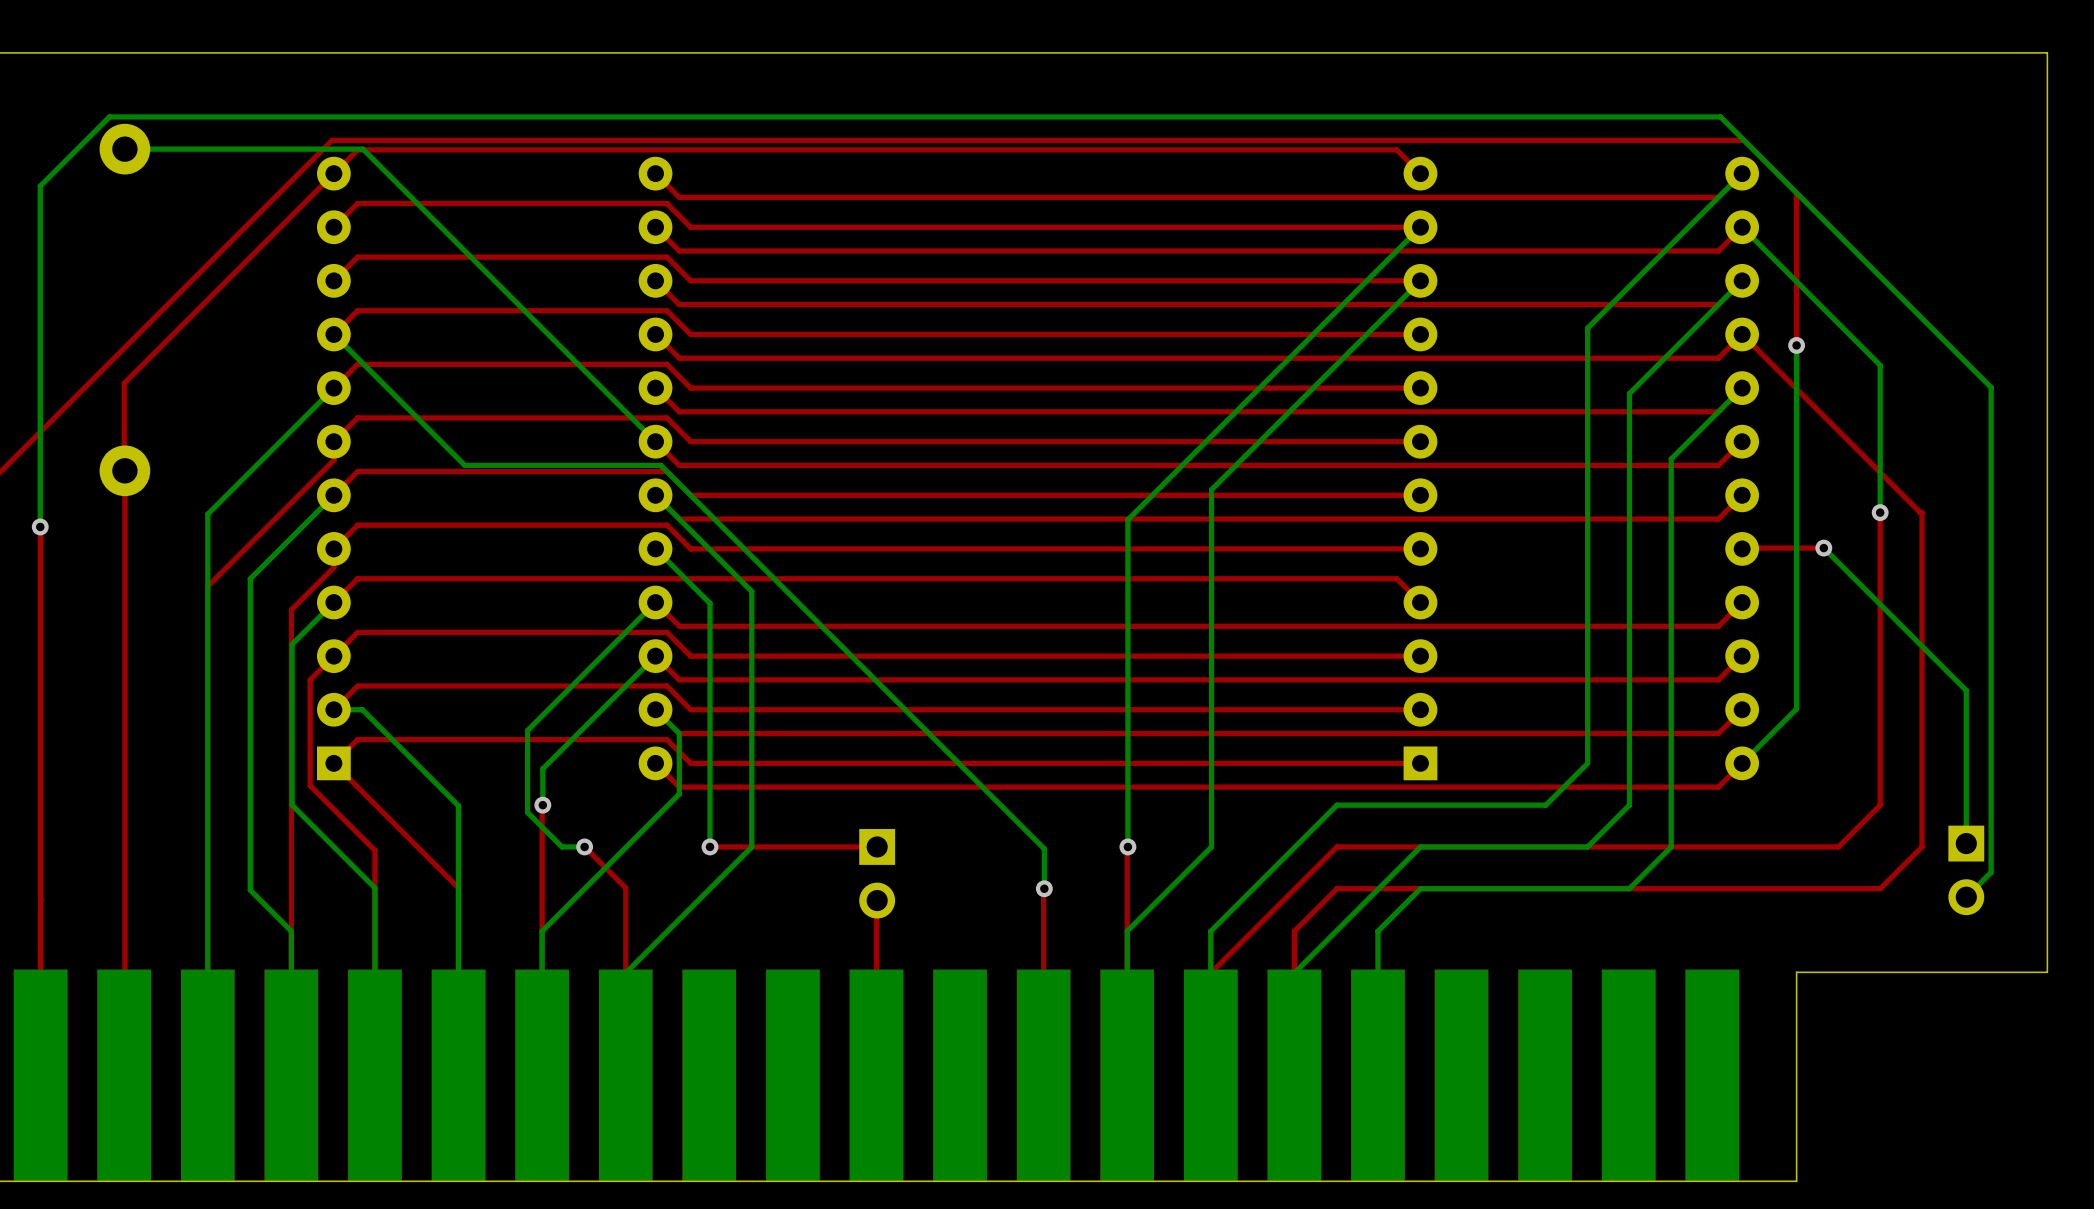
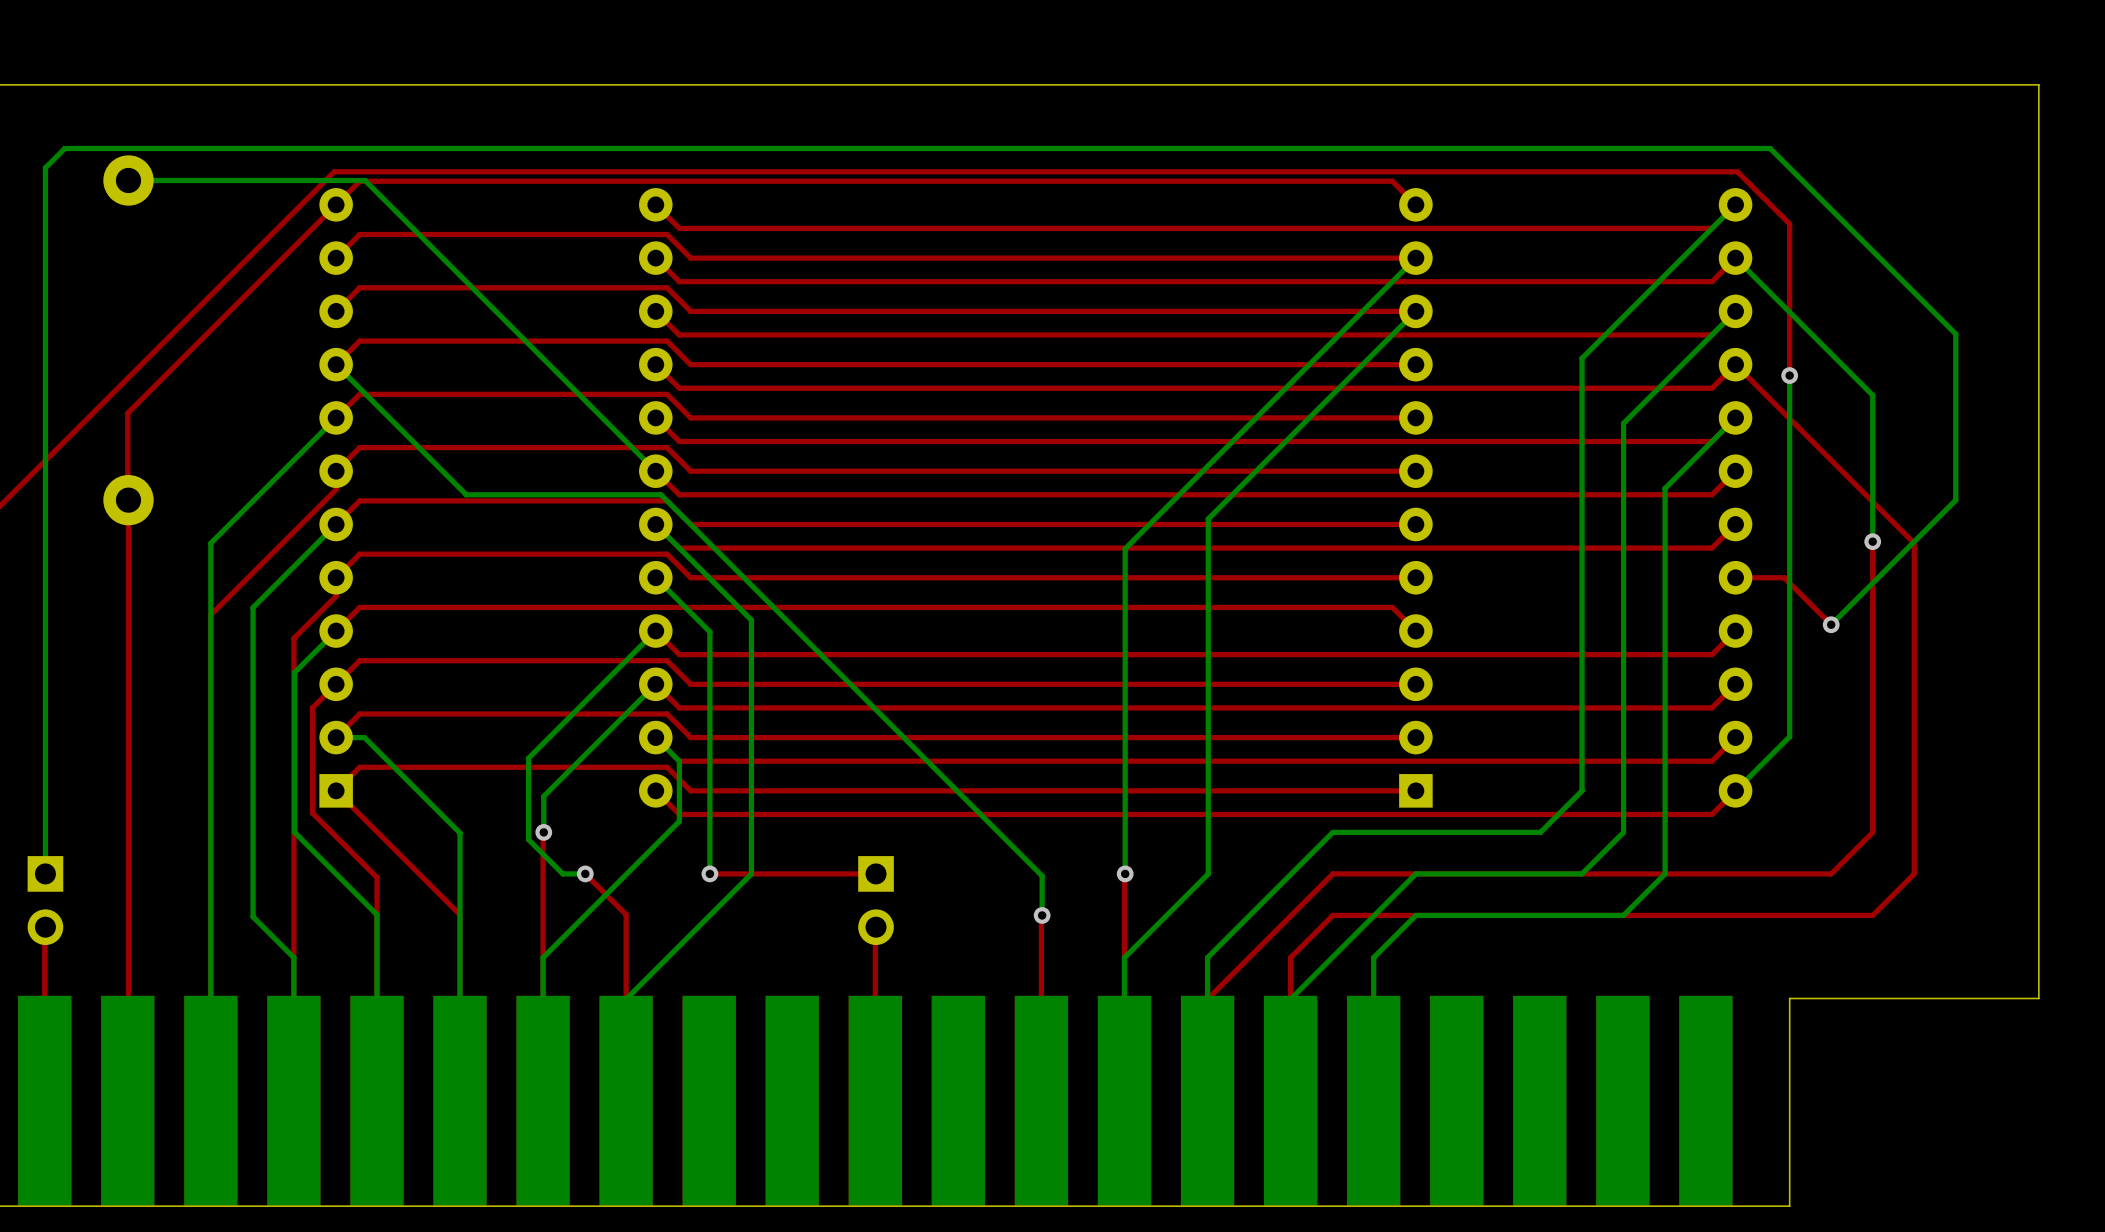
bottom track: (109, 116) (40, 186) (40, 526) -> (113, 148) (64, 148) (45, 167) (45, 873)
bottom track: (1720, 116) (1991, 387) (1991, 872) (1966, 897) -> (1714, 148) (1770, 148) (1955, 334) (1955, 500) (1831, 624)
top track: (40, 526) (40, 901) -> none
via: (40, 526) -> none
top track: (1823, 548) (1742, 548) -> (1831, 624) (1784, 577) (1735, 577)
bottom track: (1823, 548) (1966, 690) (1966, 843) -> none
via position: (1823, 548) -> (1831, 624)
part: (1966, 870) -> none
part: none -> (45, 900)

